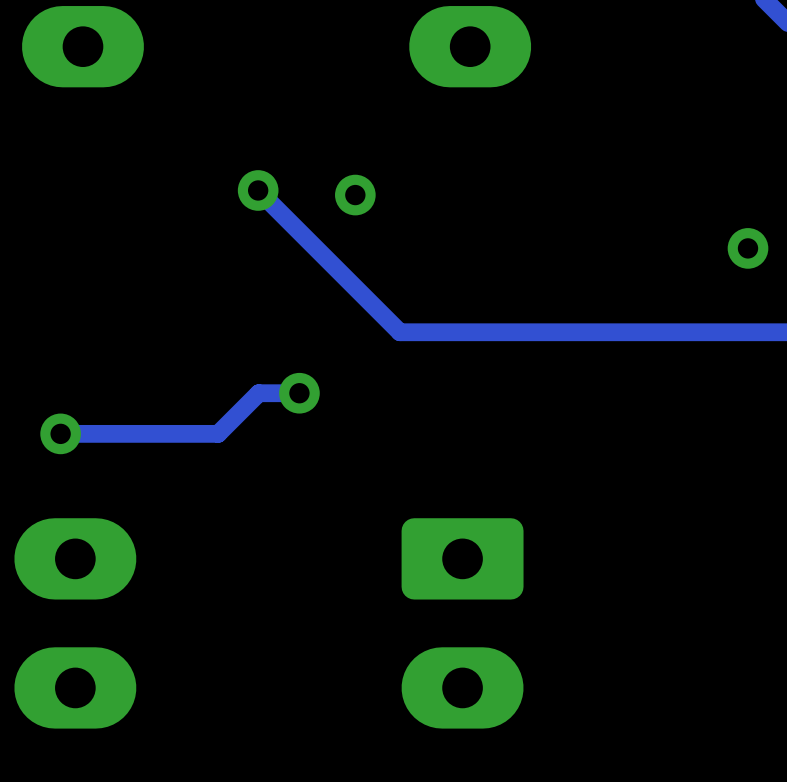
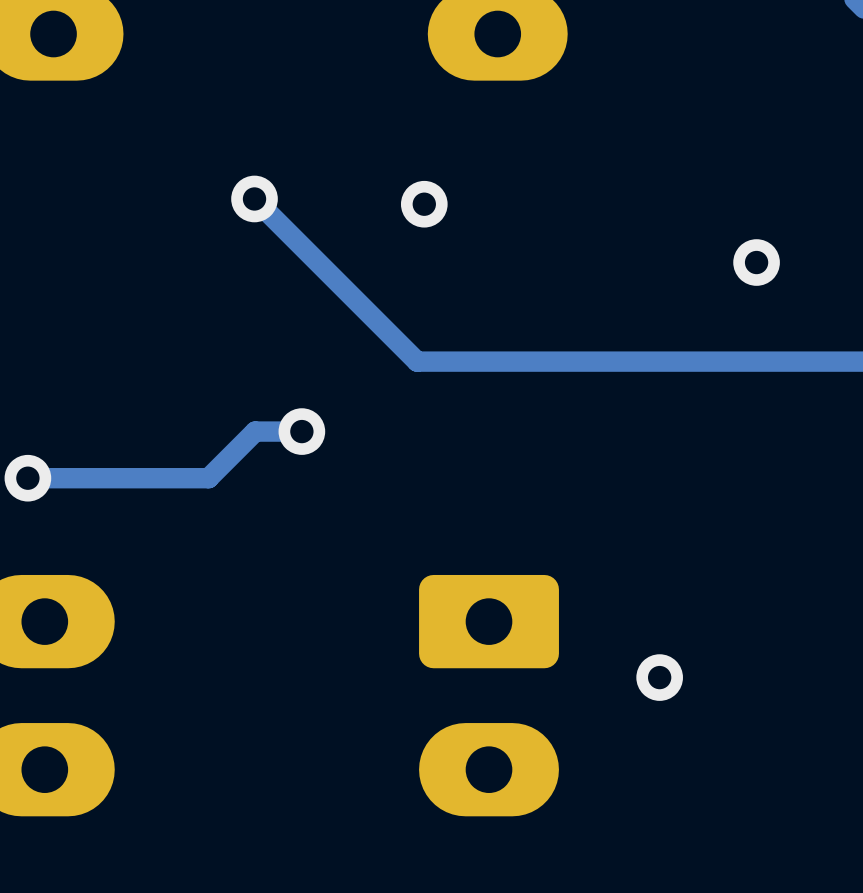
via position: (355, 195) -> (424, 204)
via position: (748, 248) -> (756, 262)
via: none -> (659, 677)

